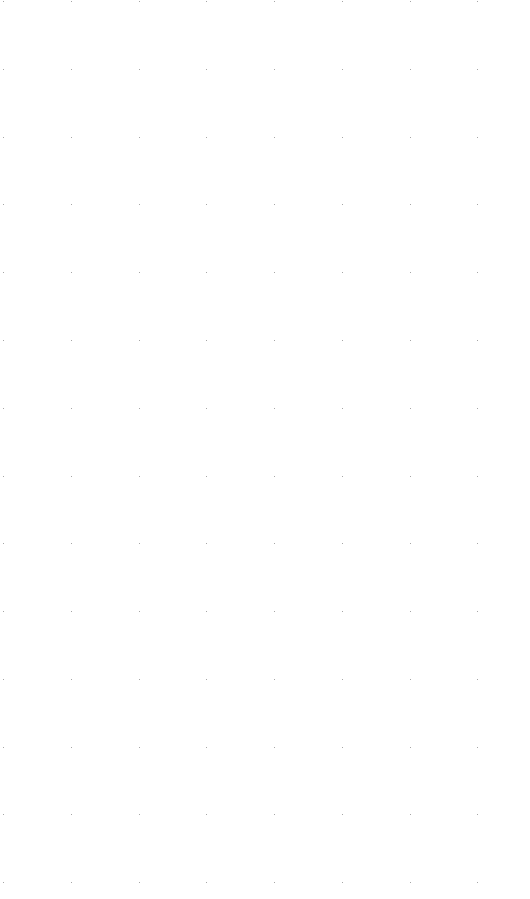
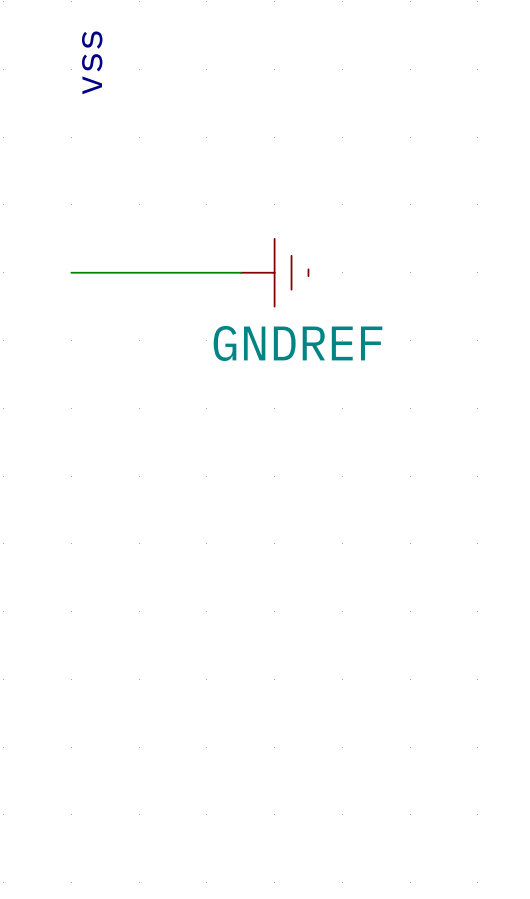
text: none -> vss (92, 62)
wire: none -> (71, 272) (240, 272)
power symbol: none -> GNDREF (274, 272)

